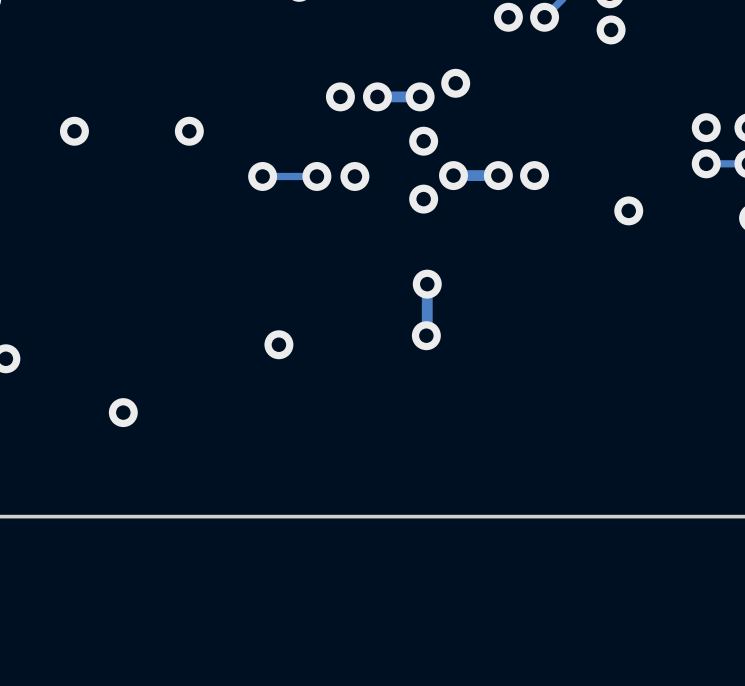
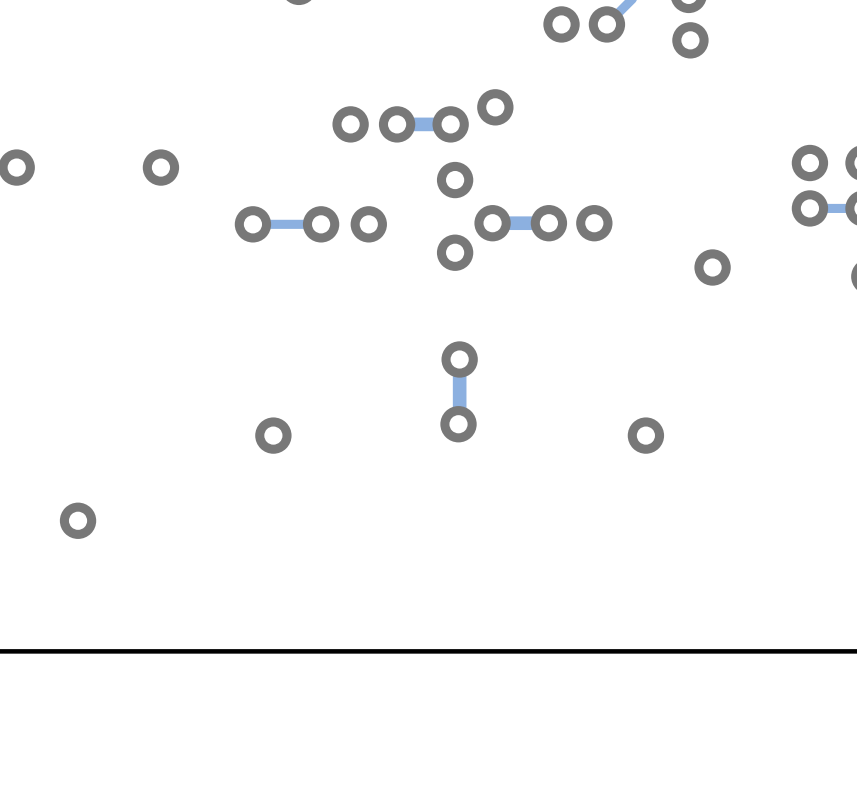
via: none -> (645, 435)

